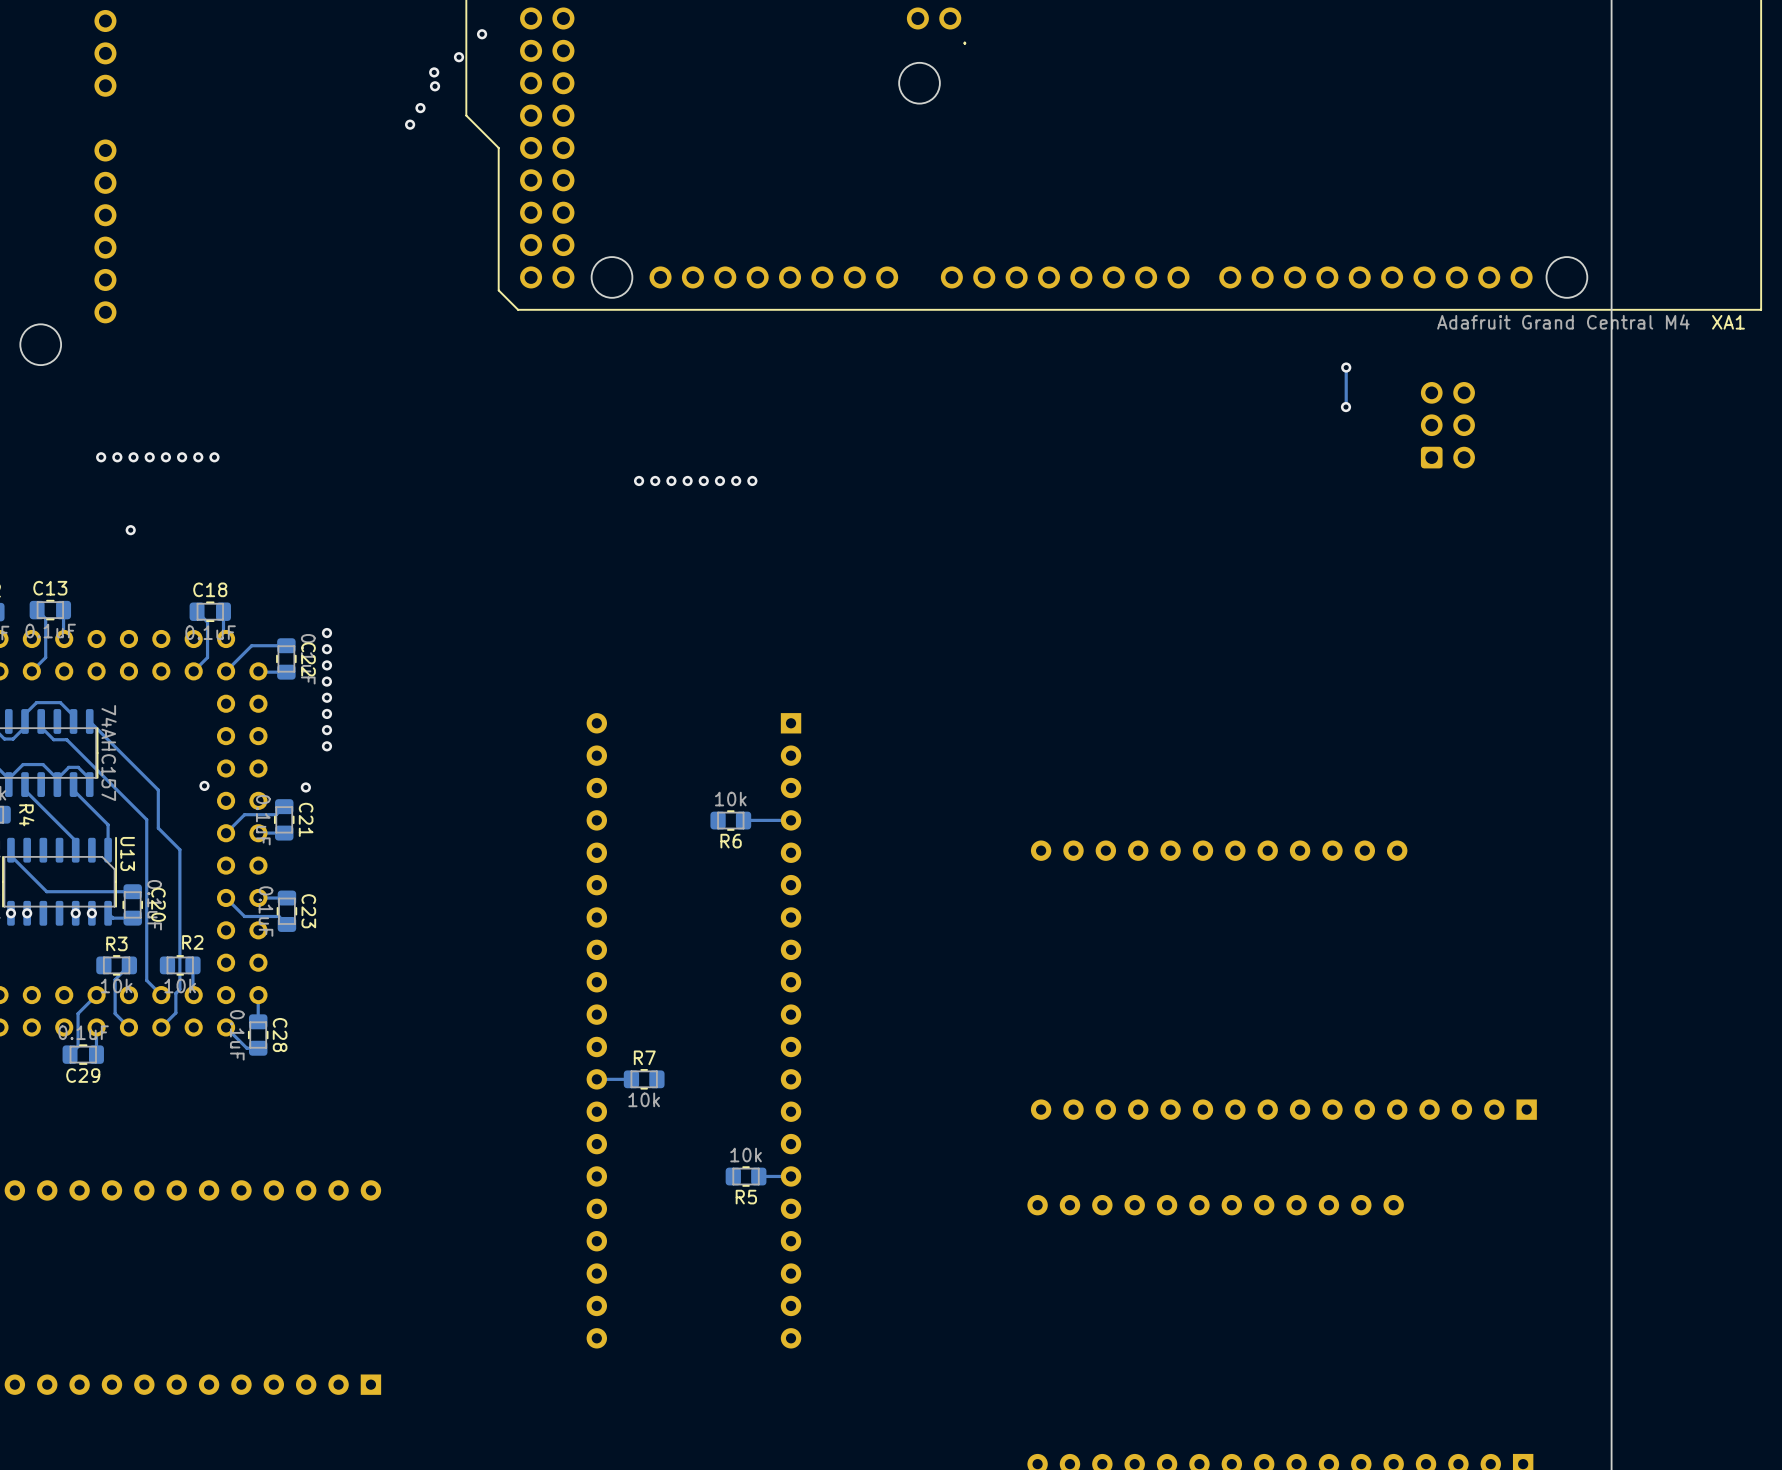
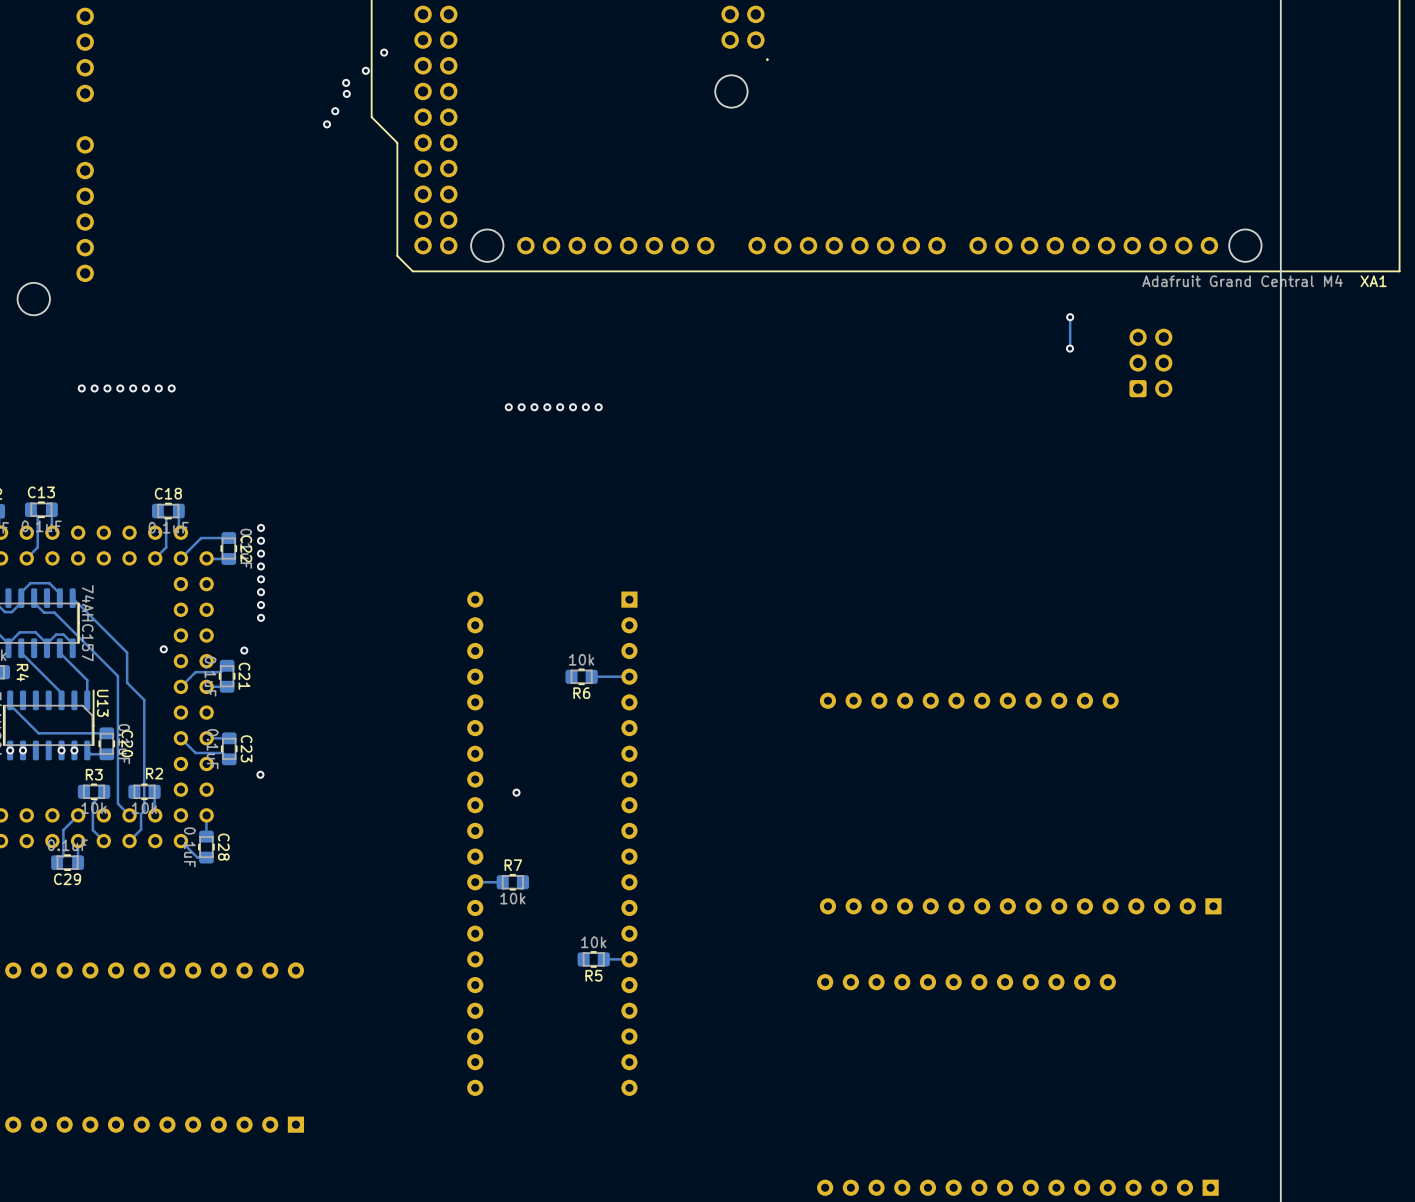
via: (130, 530) -> none
via: none -> (260, 774)
via: none -> (516, 792)

